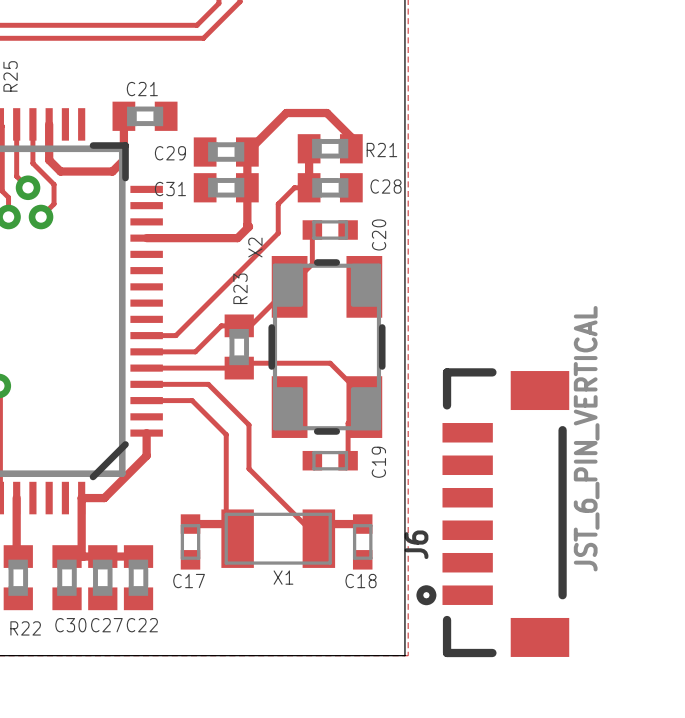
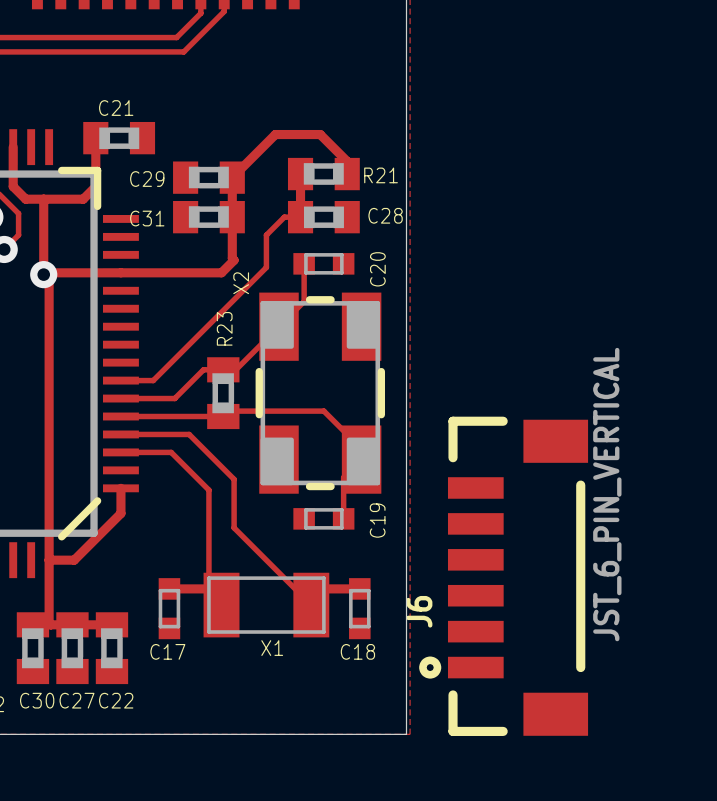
track: none -> (43, 199) (43, 274) (49, 280) (49, 560)
track: none -> (43, 271) (45, 272) (120, 272)
via: none -> (43, 274)

